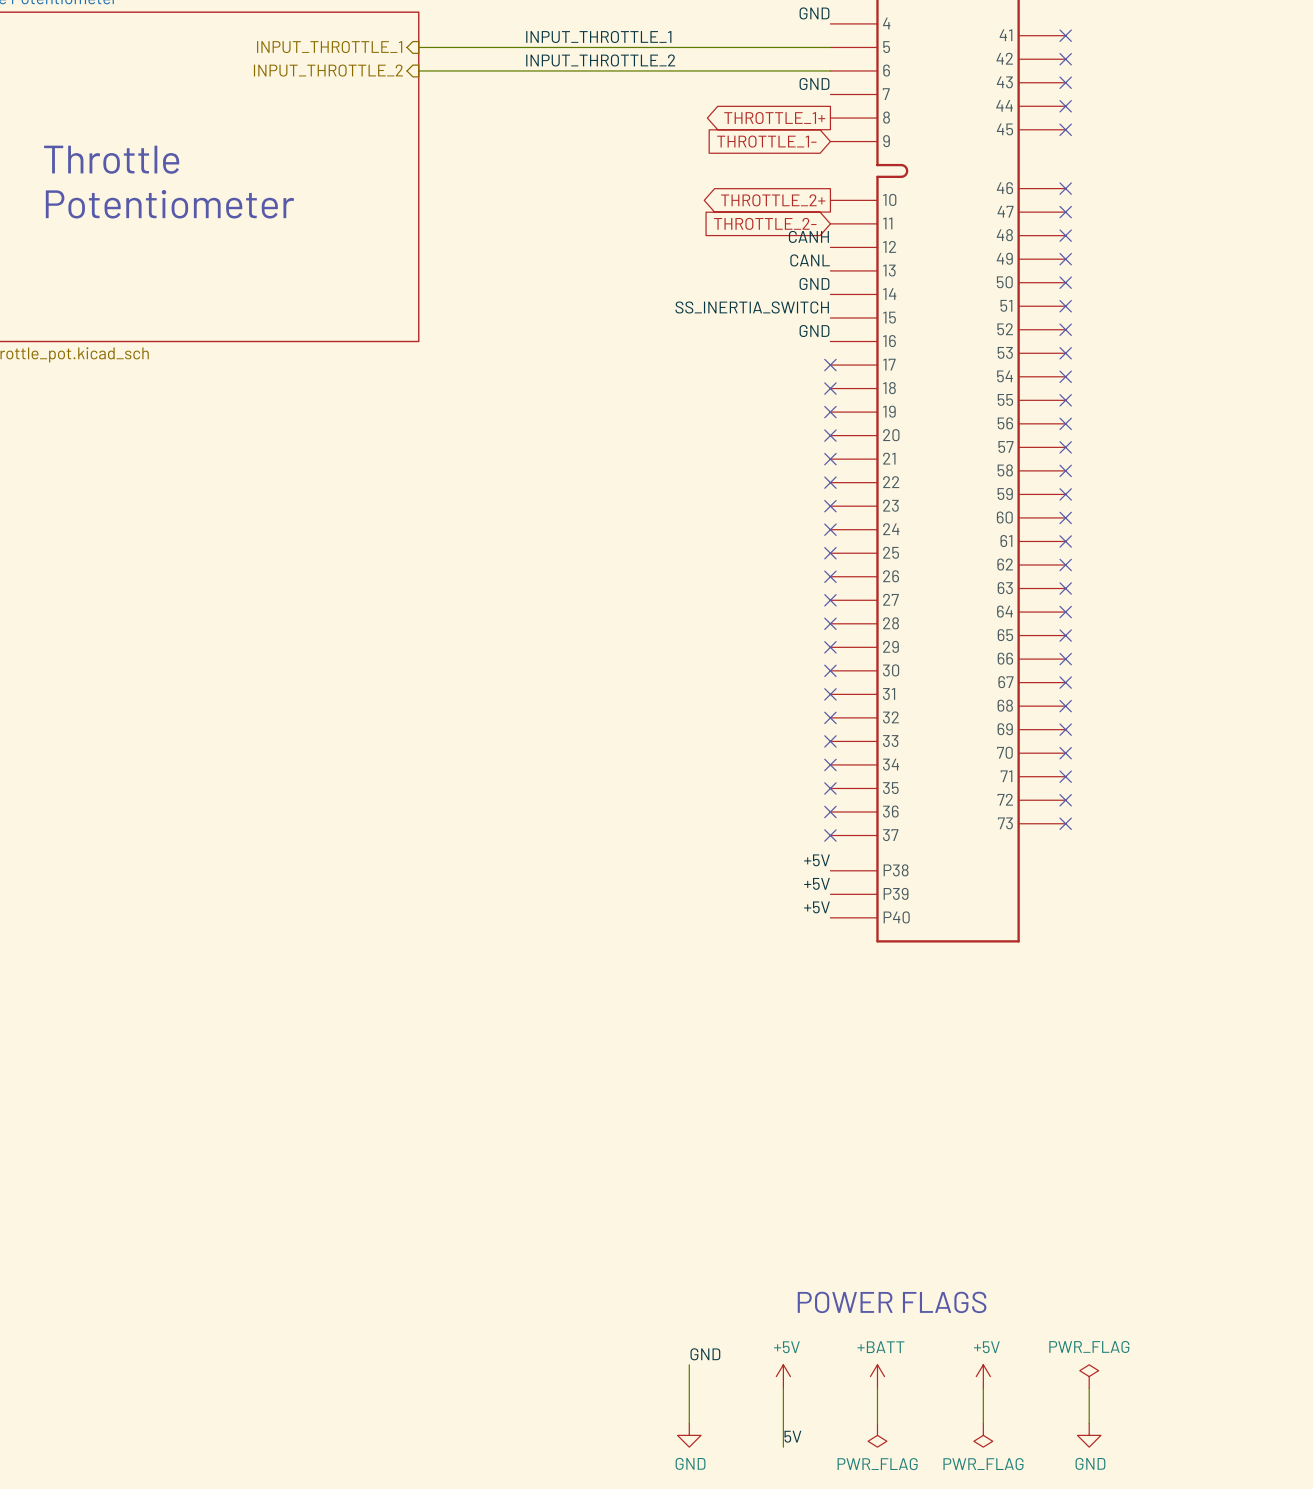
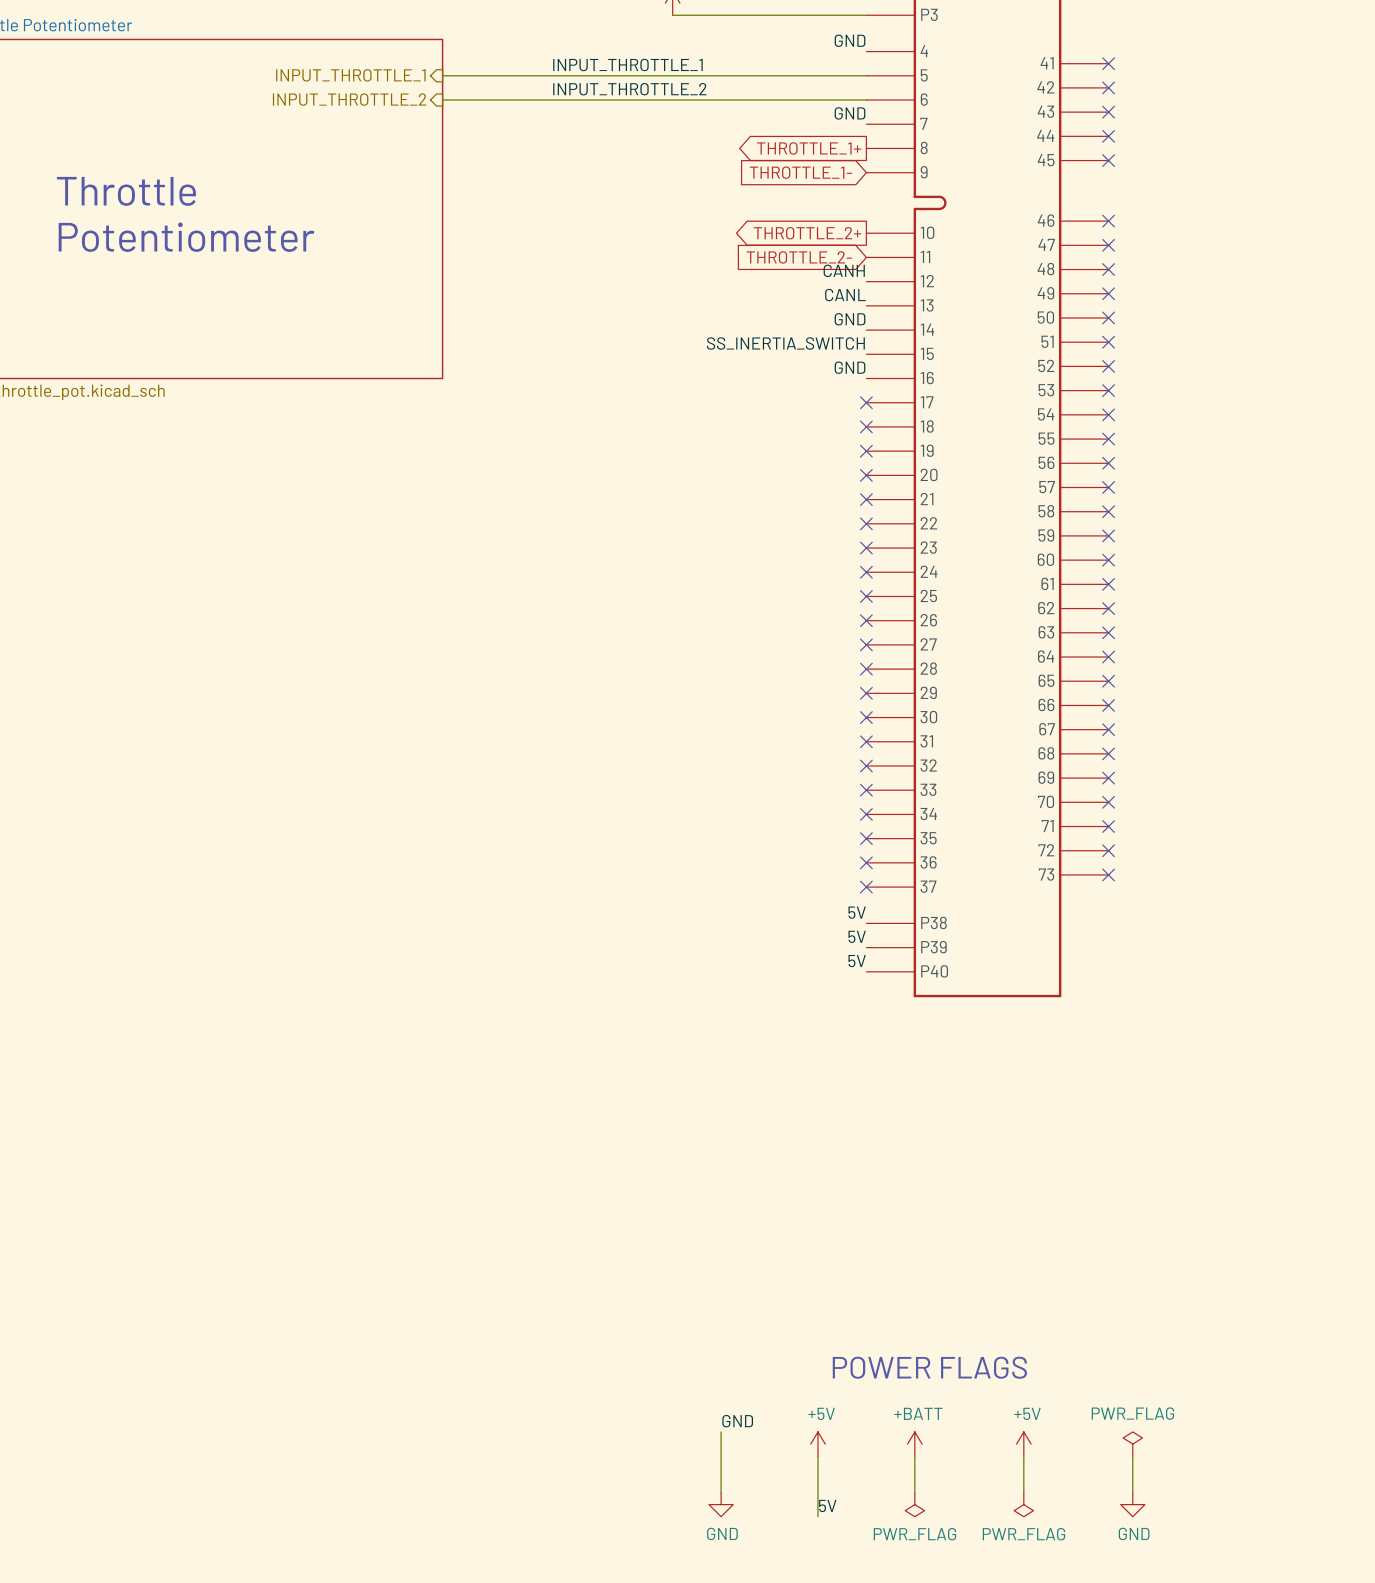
label: +5V (817, 860) -> 5V (857, 912)
label: +5V (817, 883) -> 5V (857, 936)
label: +5V (817, 907) -> 5V (857, 961)

